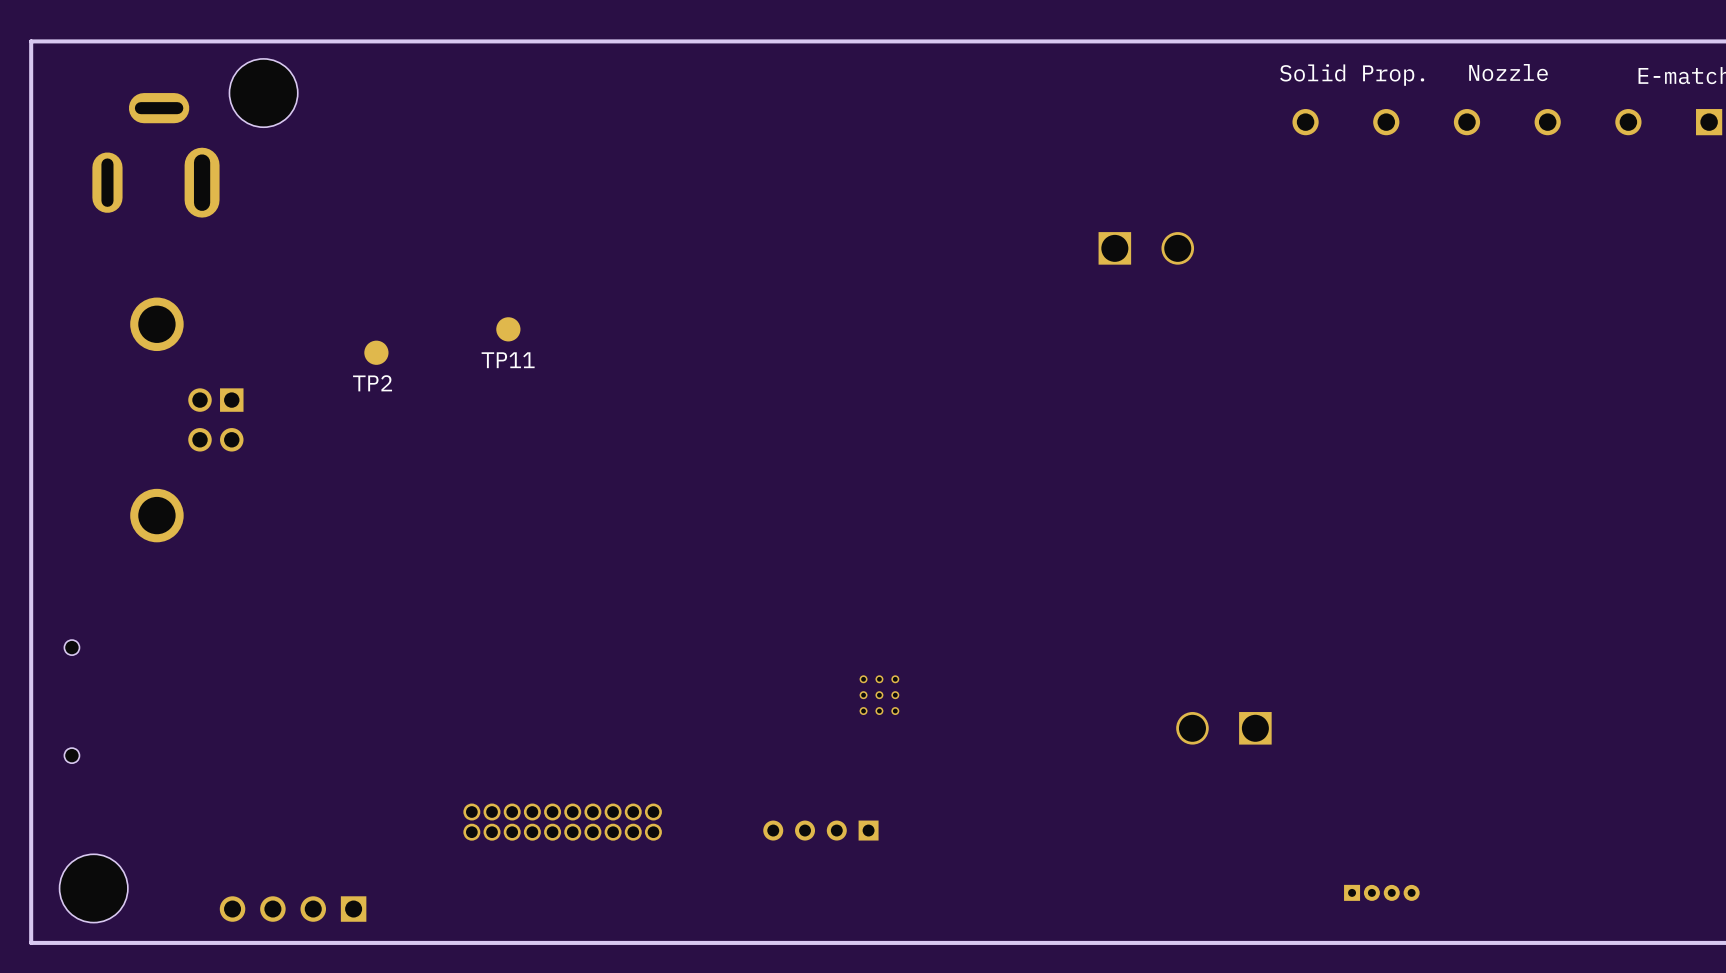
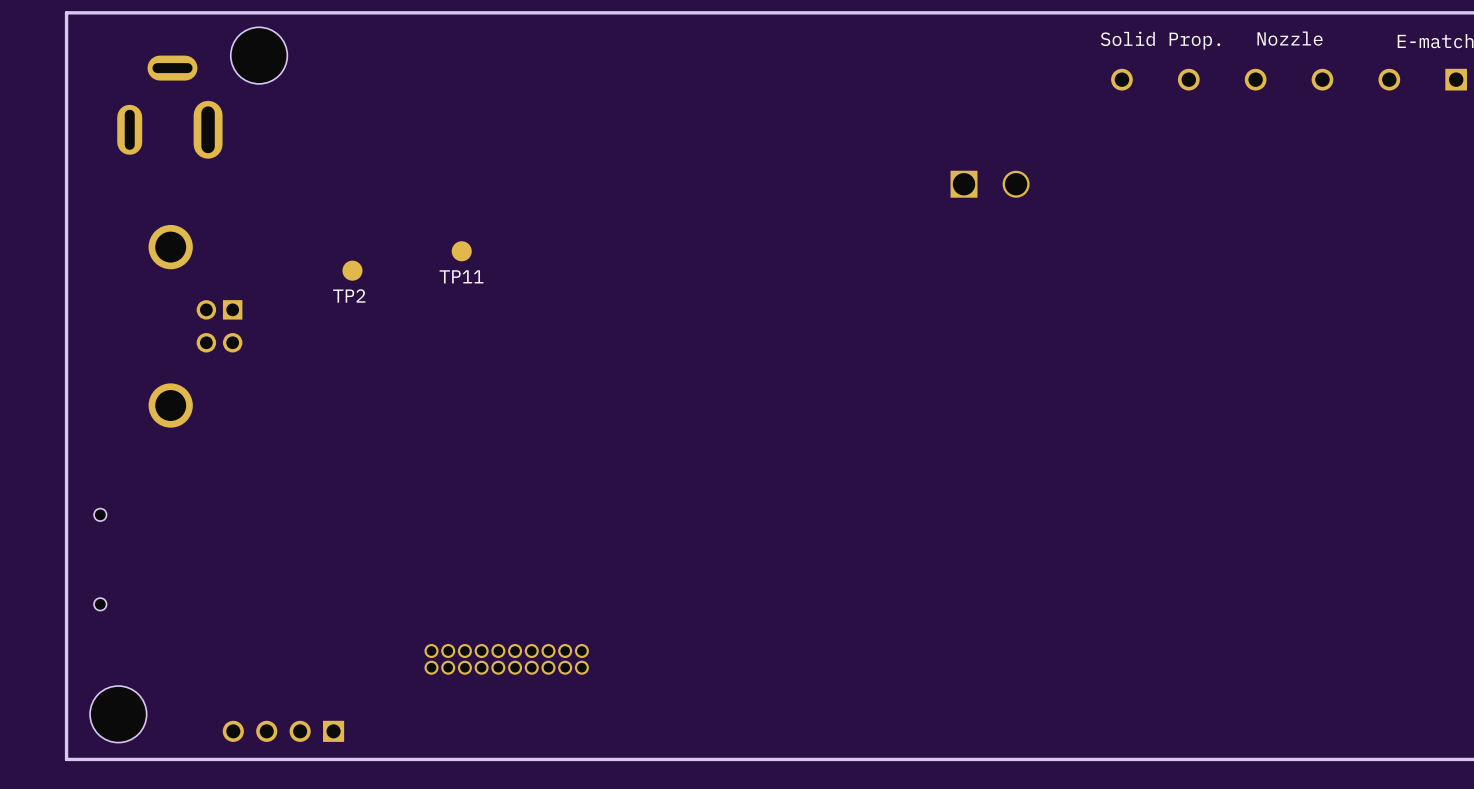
part: (879, 695) -> none
part: (1223, 728) -> none
part: (820, 830) -> none
part: (1381, 892) -> none

